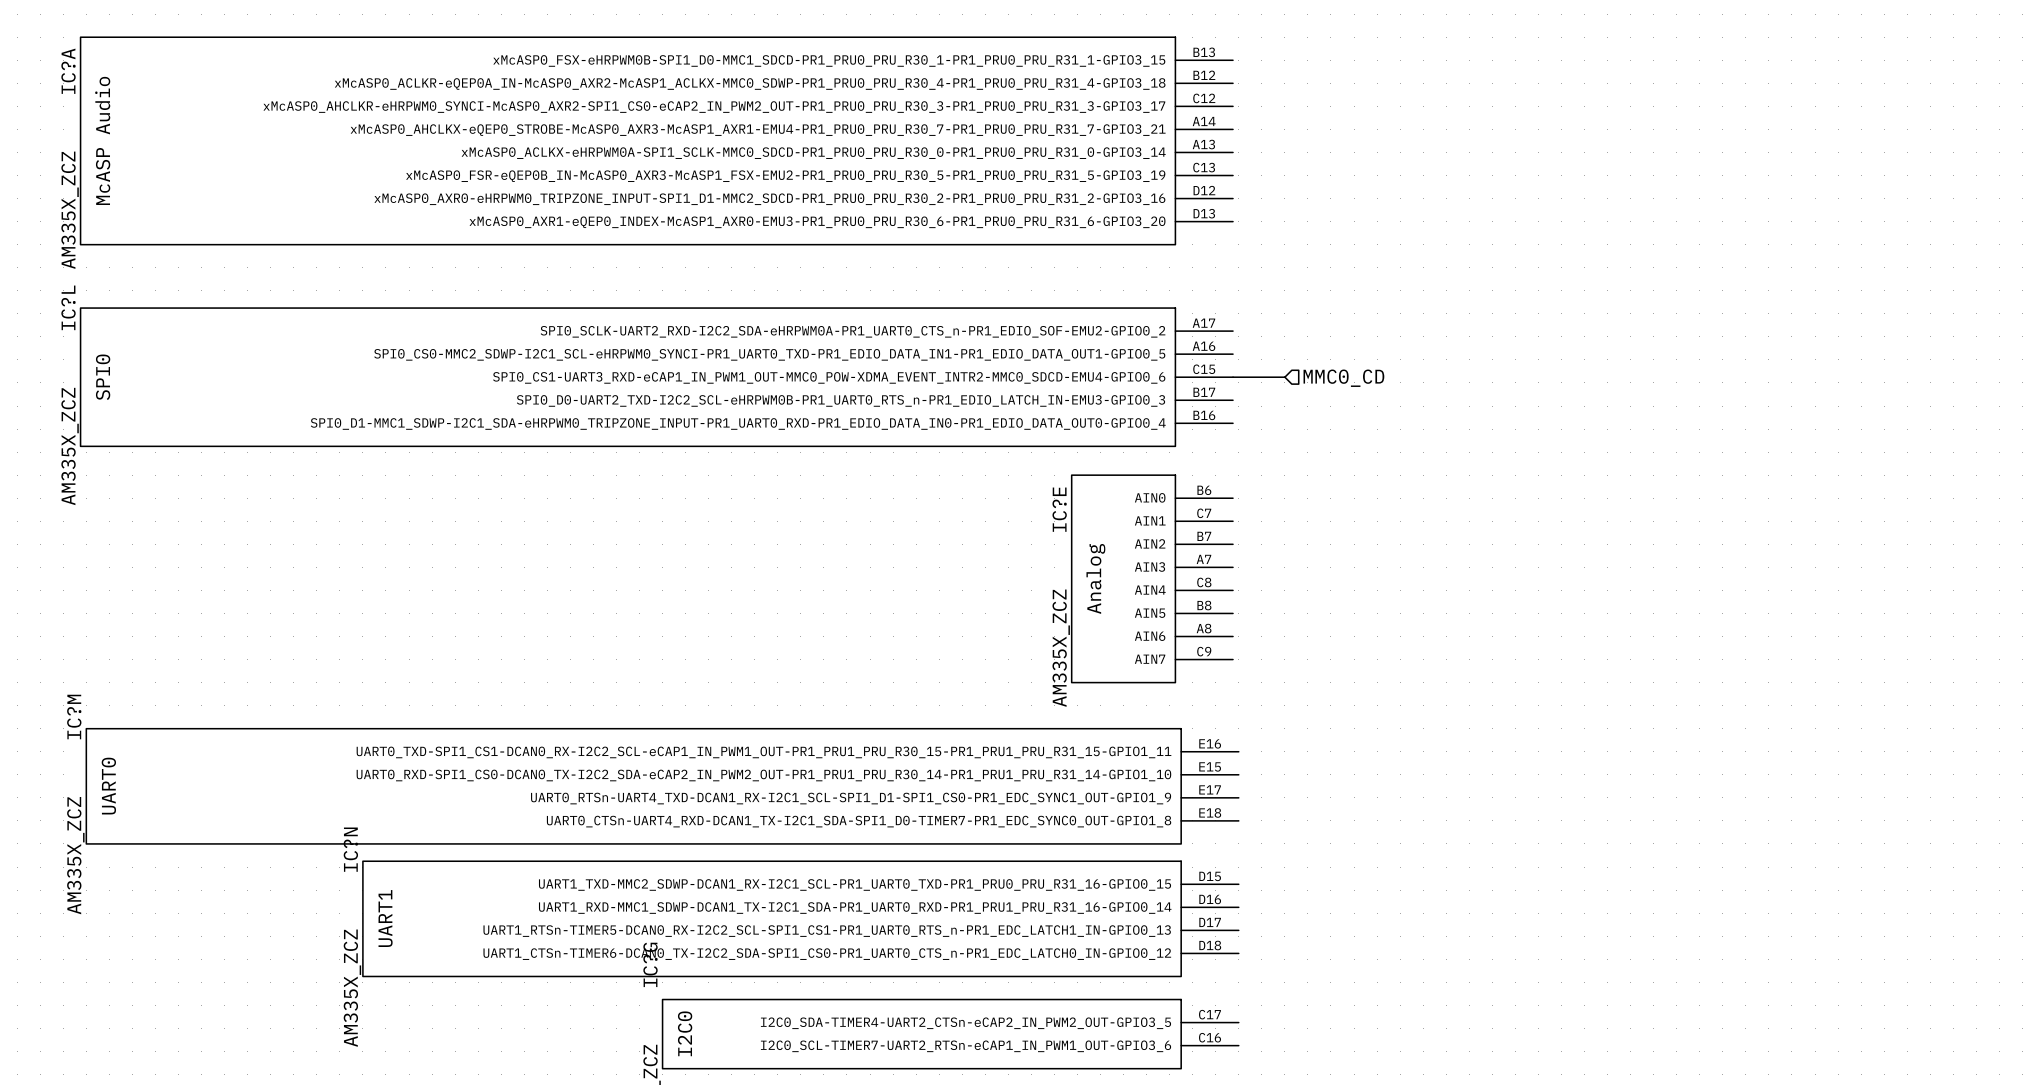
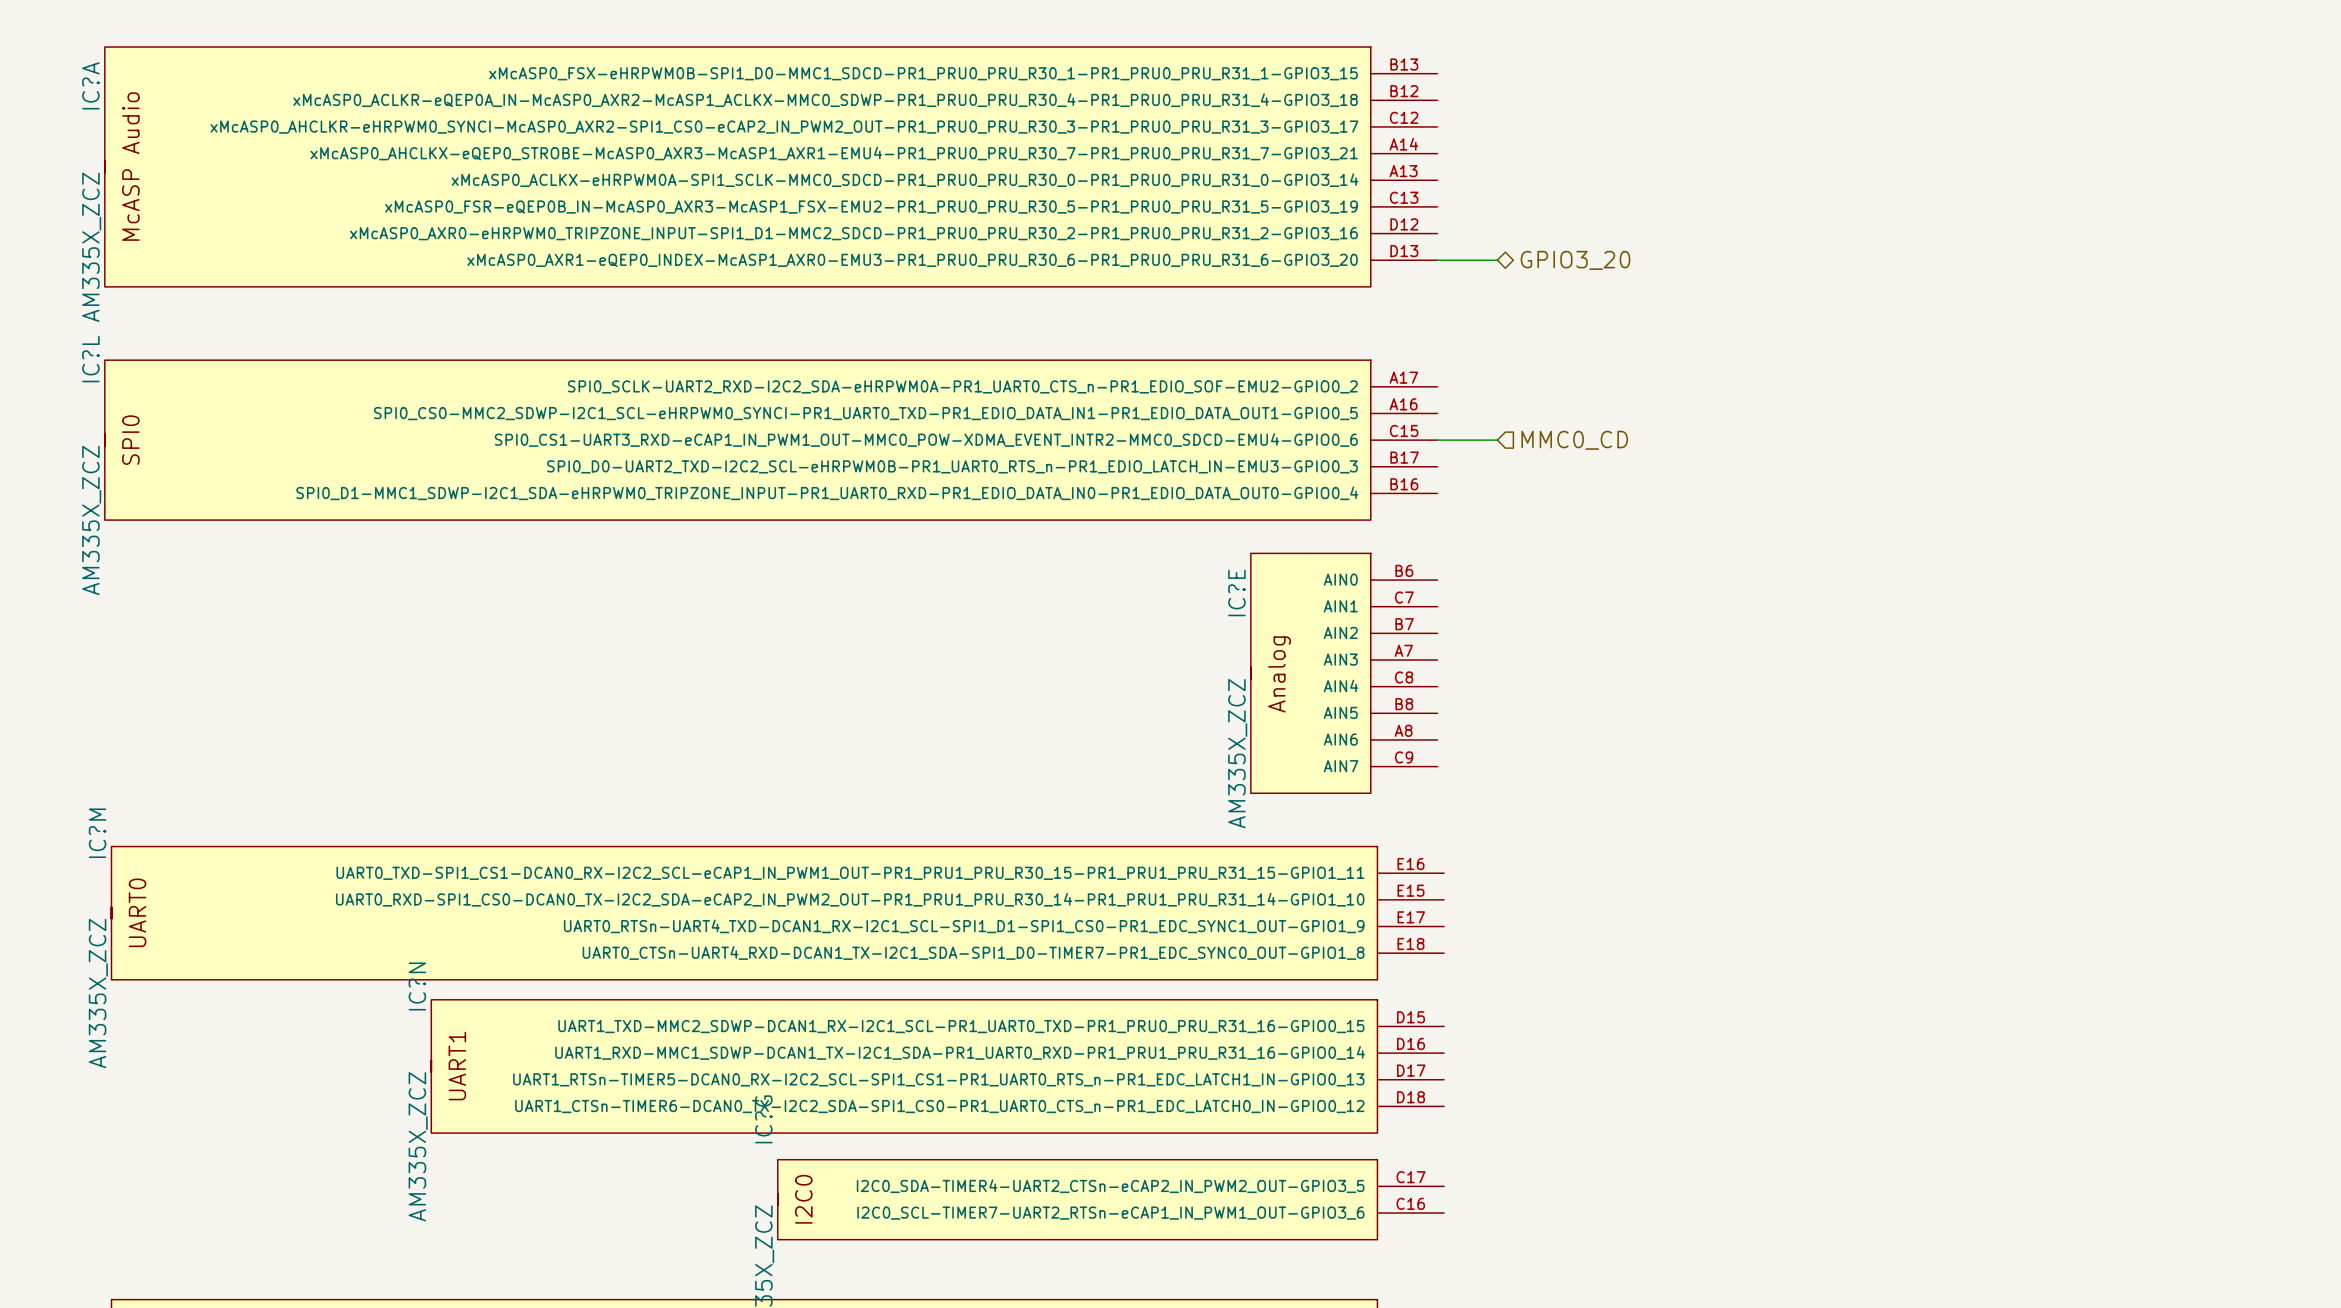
wire: none -> (1437, 260) (1497, 260)
hierarchical label: none -> GPIO3_20 (1575, 260)

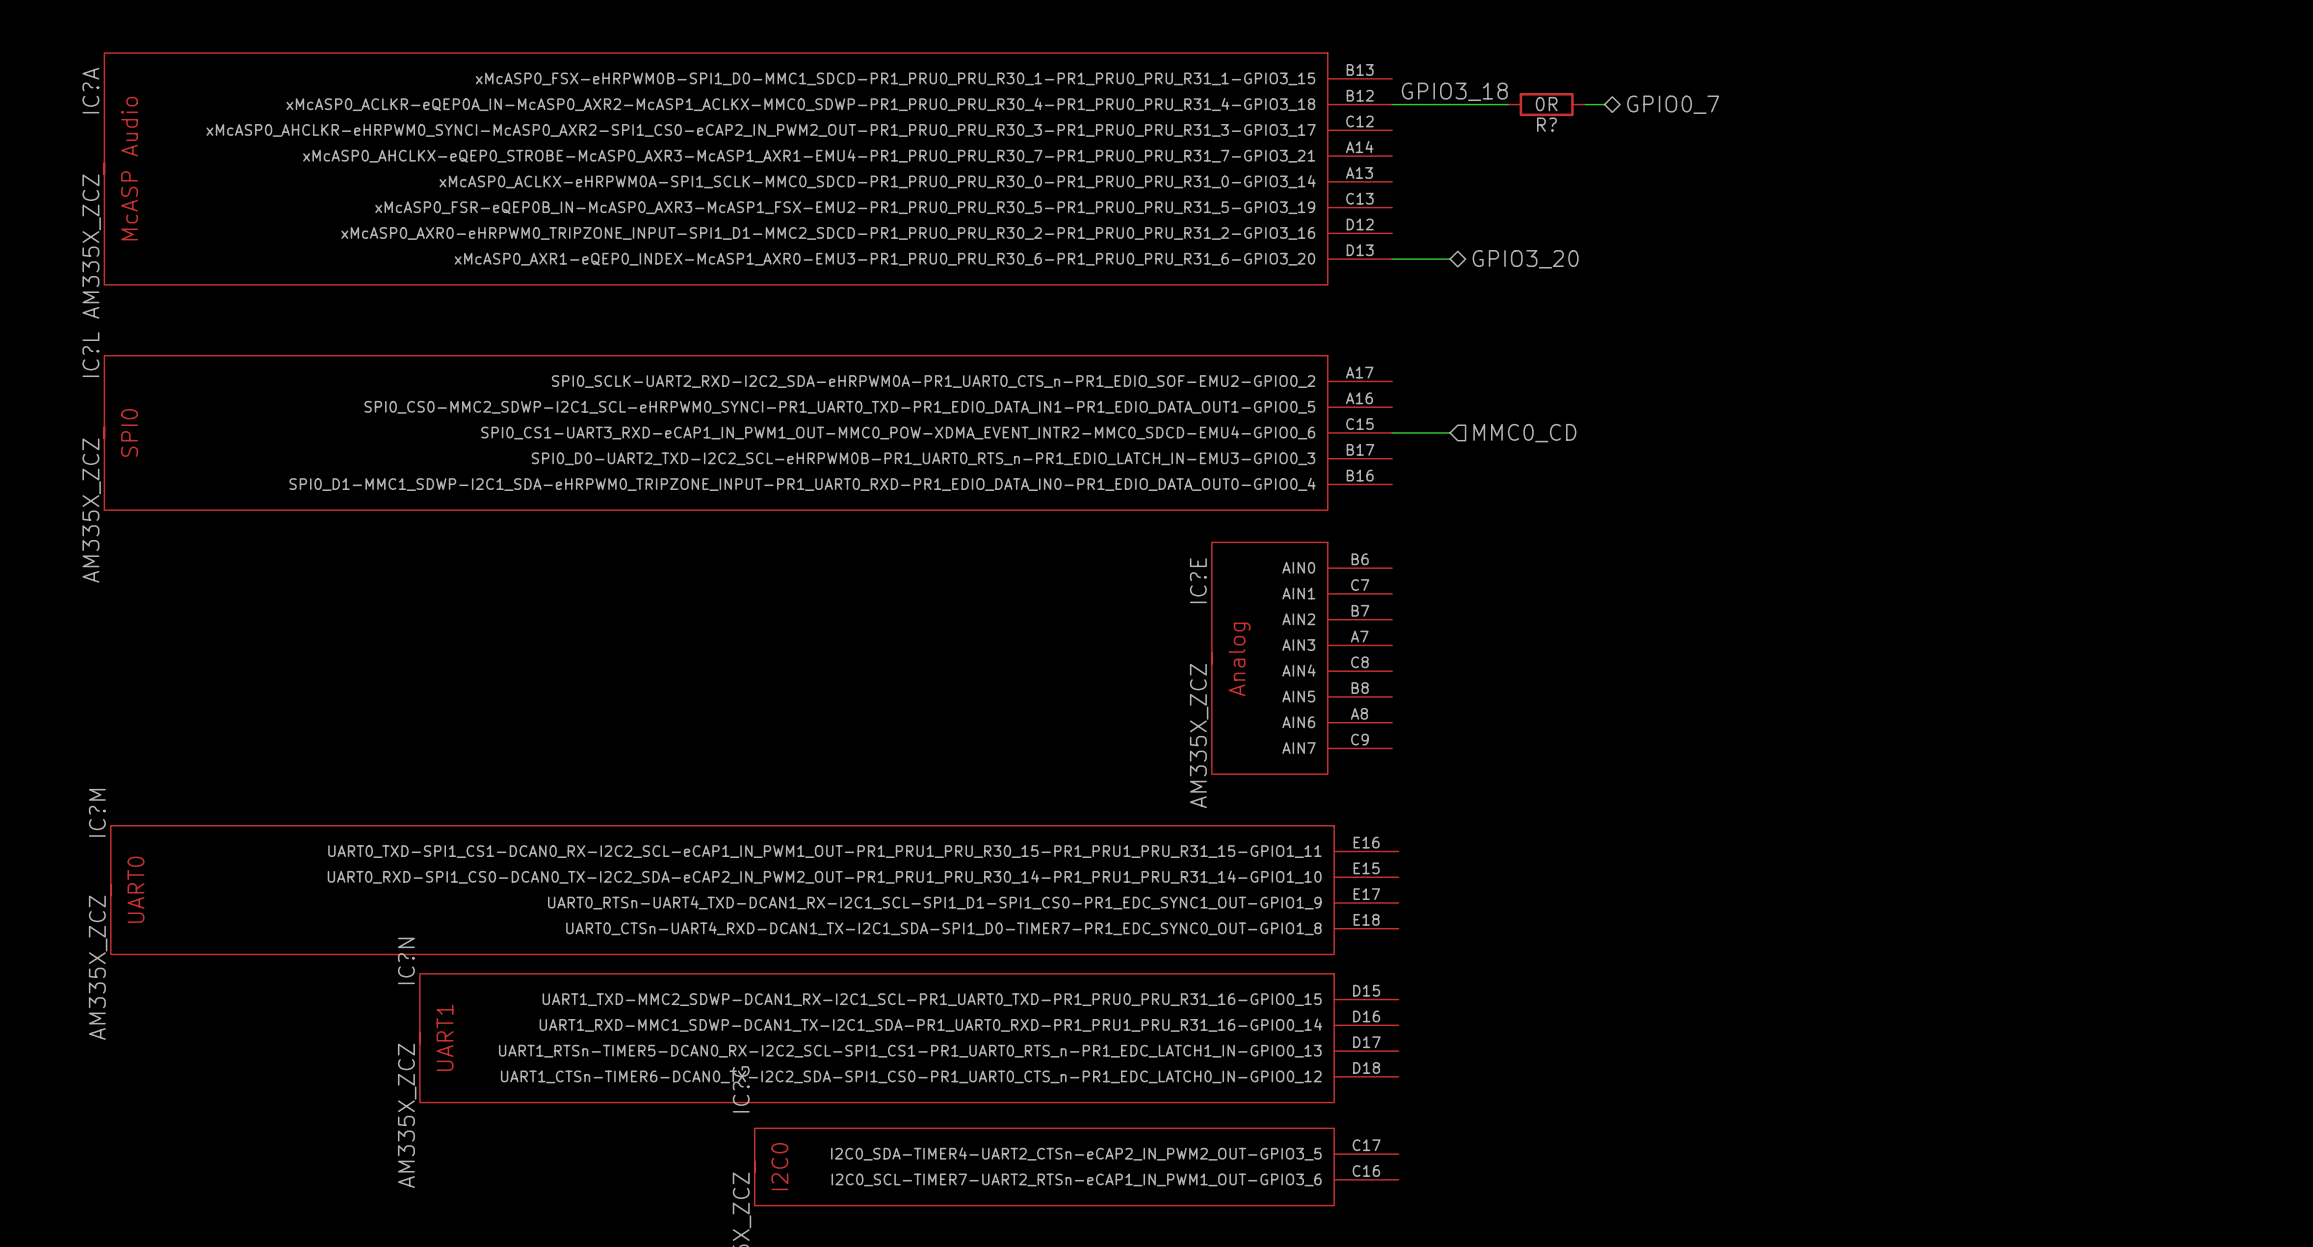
label: none -> GPIO3_18 (1454, 91)
wire: none -> (1392, 104) (1508, 104)
R?: none -> 0R (1546, 104)
wire: none -> (1585, 104) (1604, 104)
hierarchical label: none -> GPIO0_7 (1673, 104)

